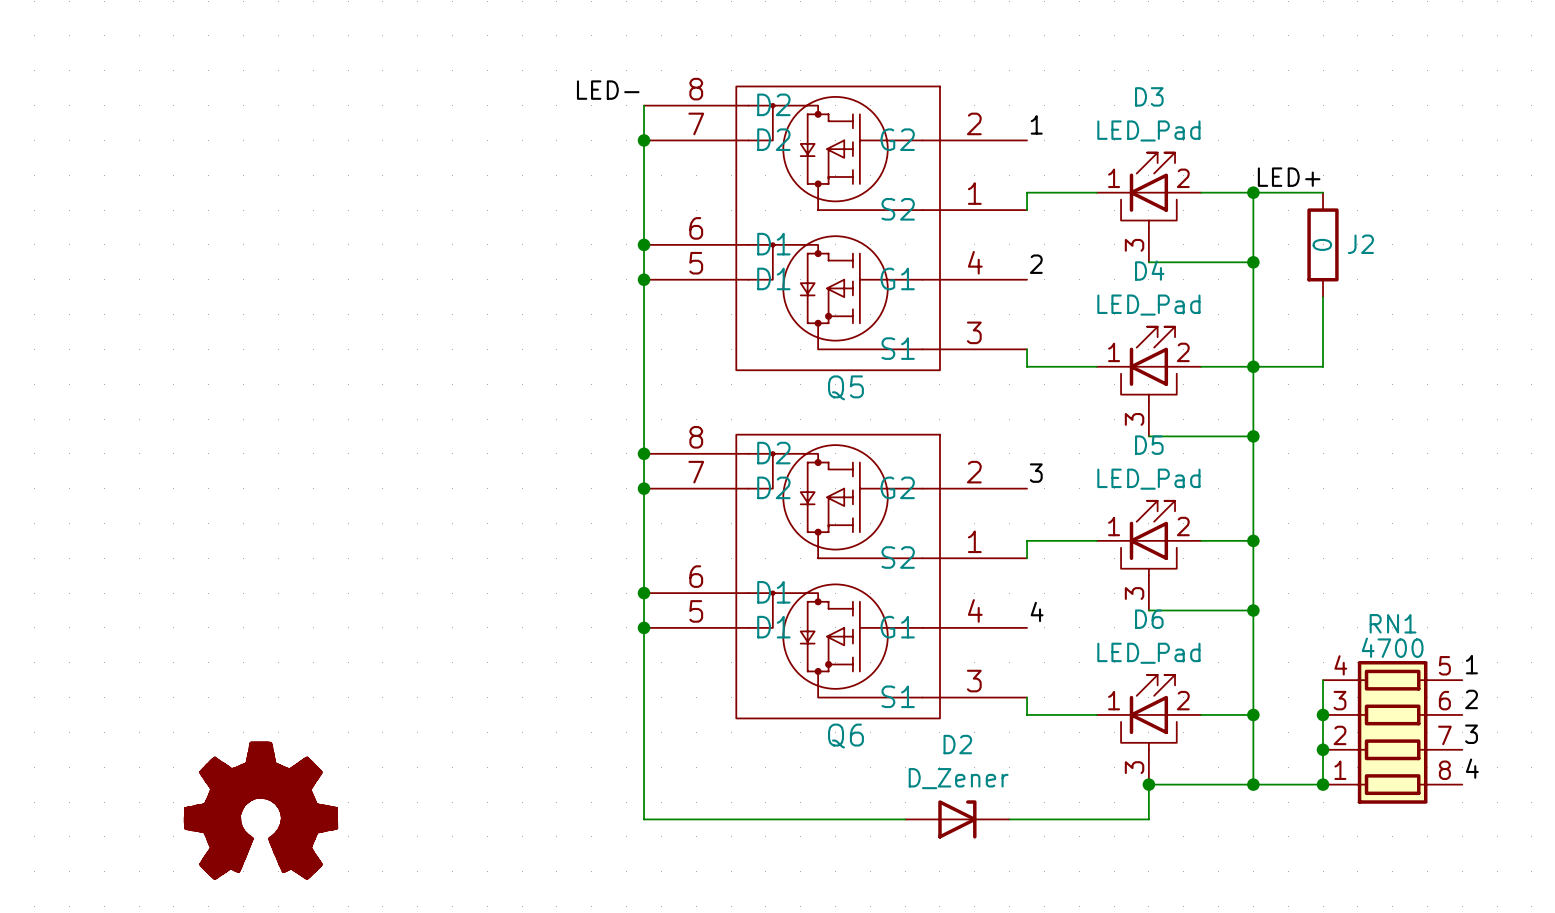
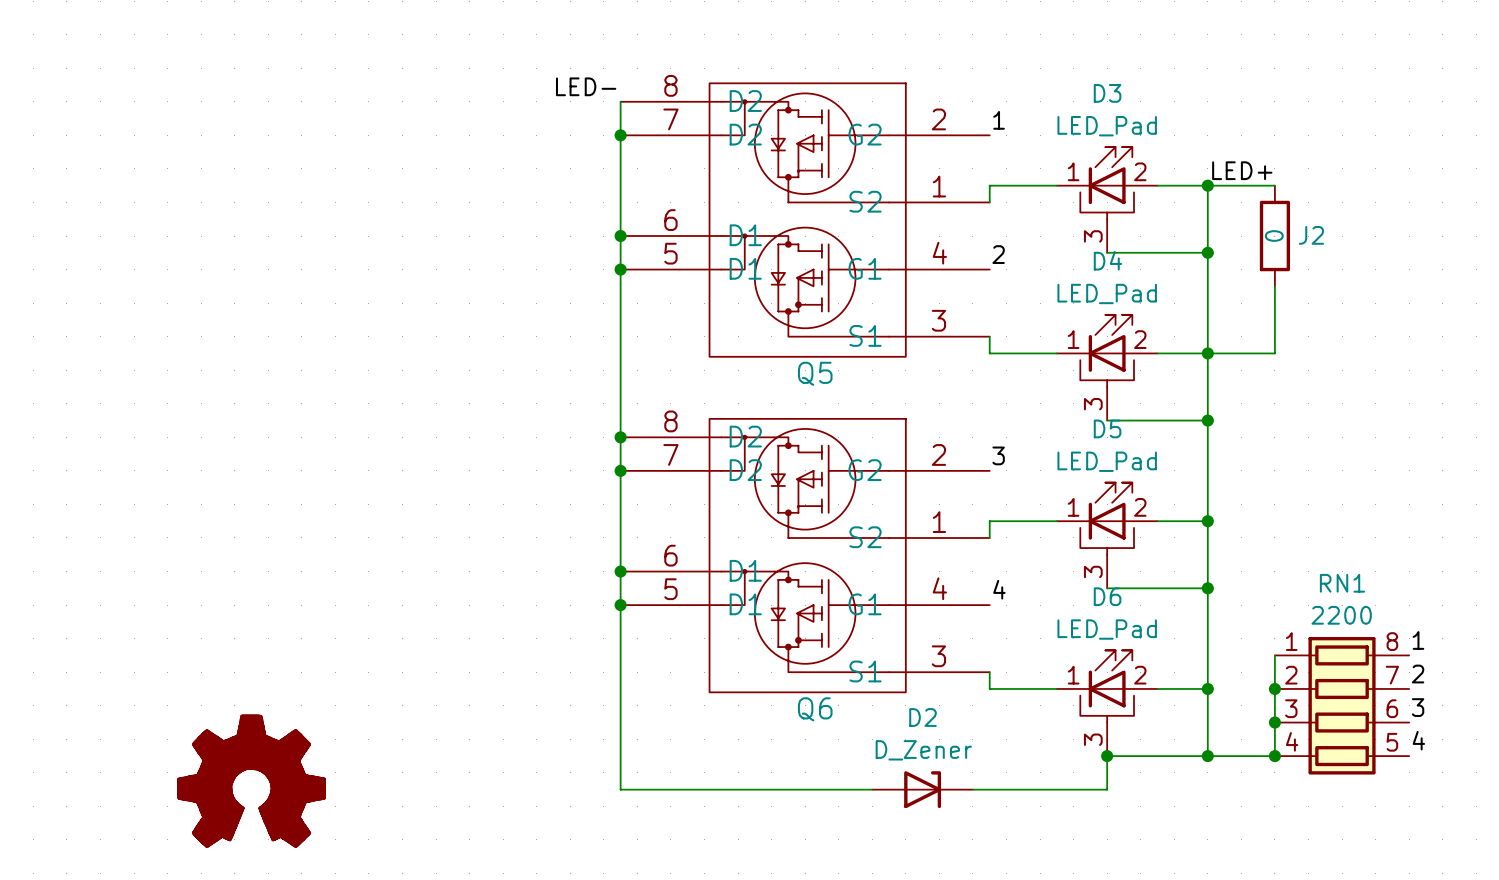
RN1 value: 4700 (1392, 647) -> 2200 (1341, 615)
RN1 flip: as is (1392, 732) -> up-down (1342, 705)

